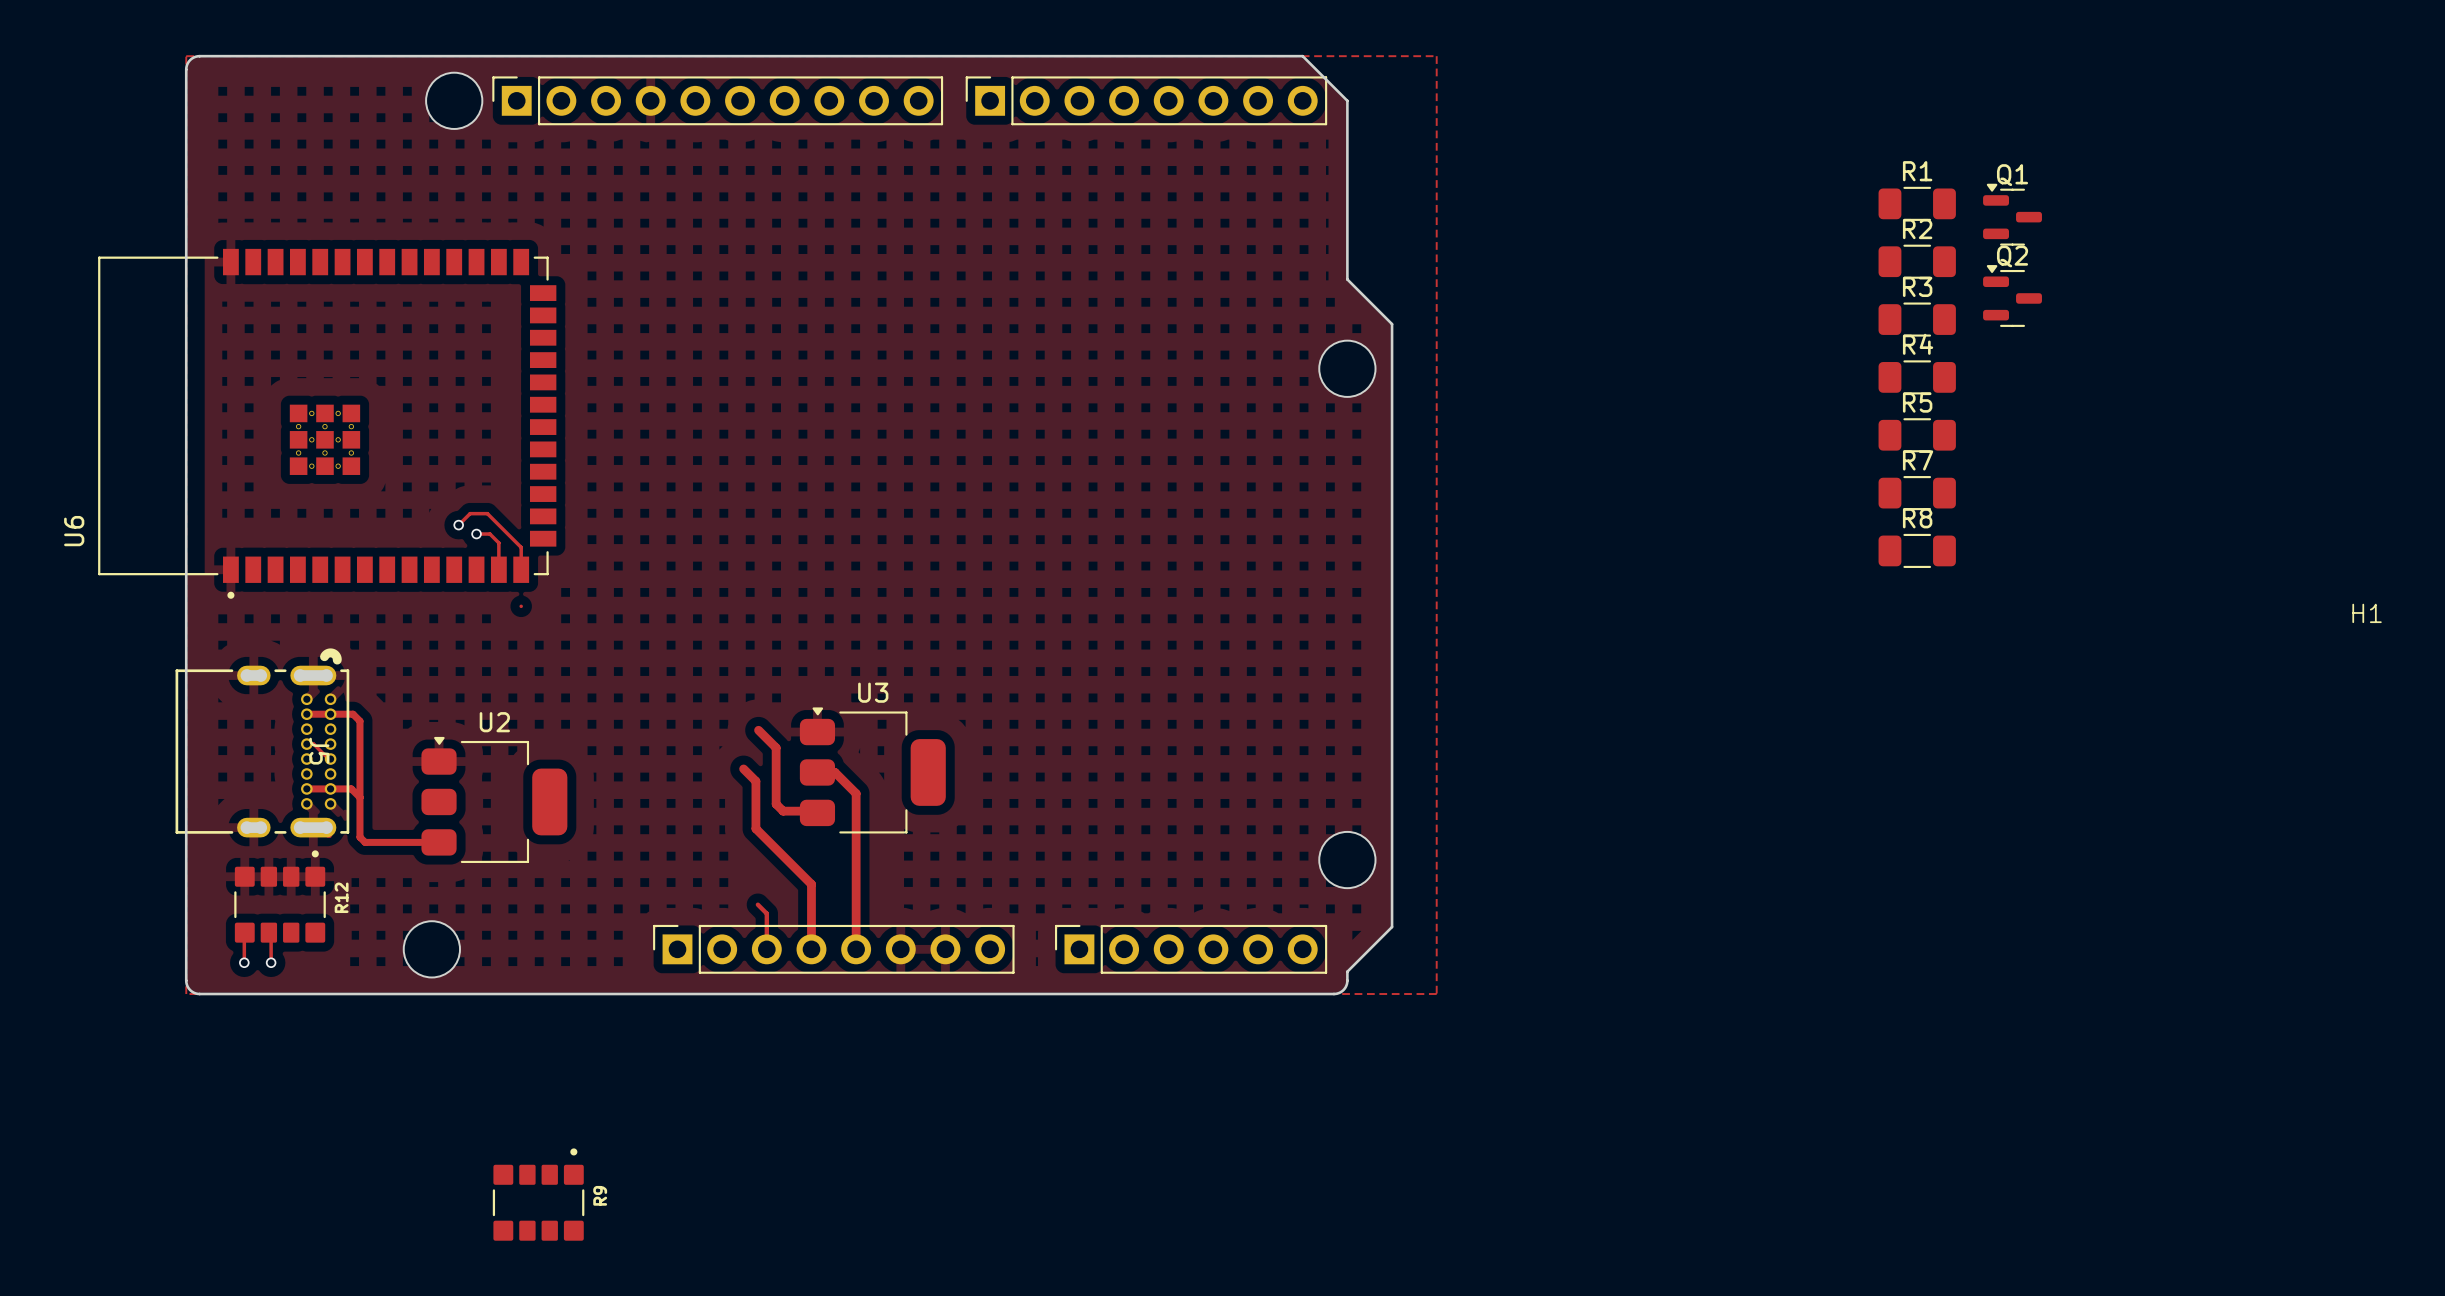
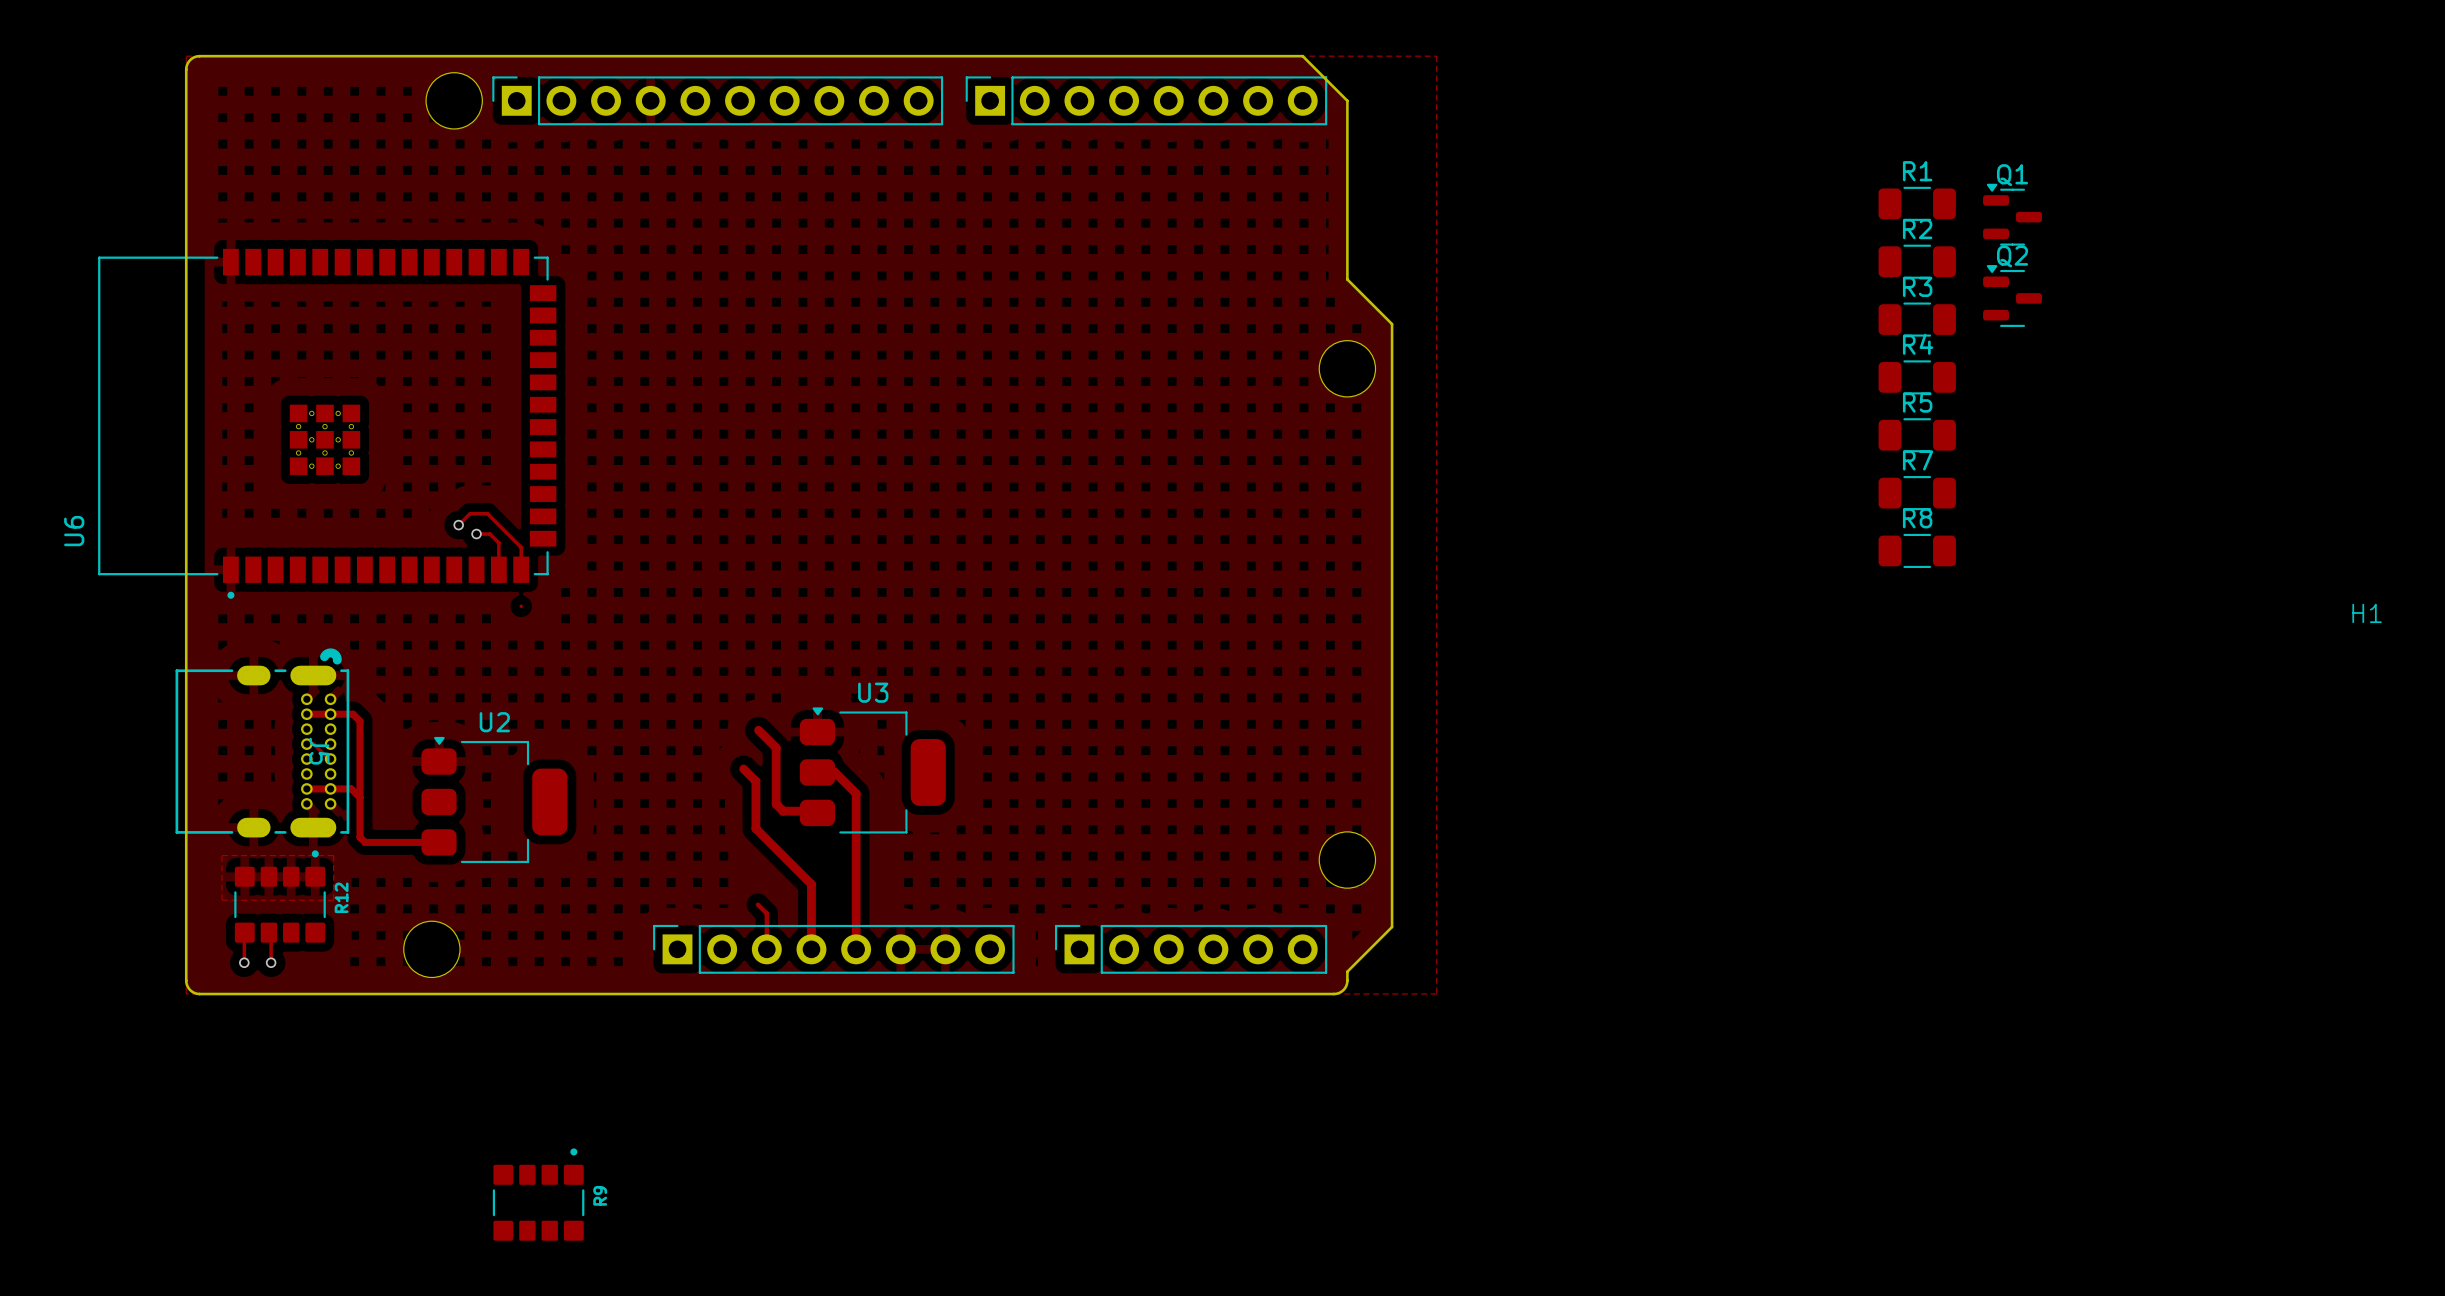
zone outline: none -> (221, 855) (333, 855) (333, 900) (221, 900) (221, 855)

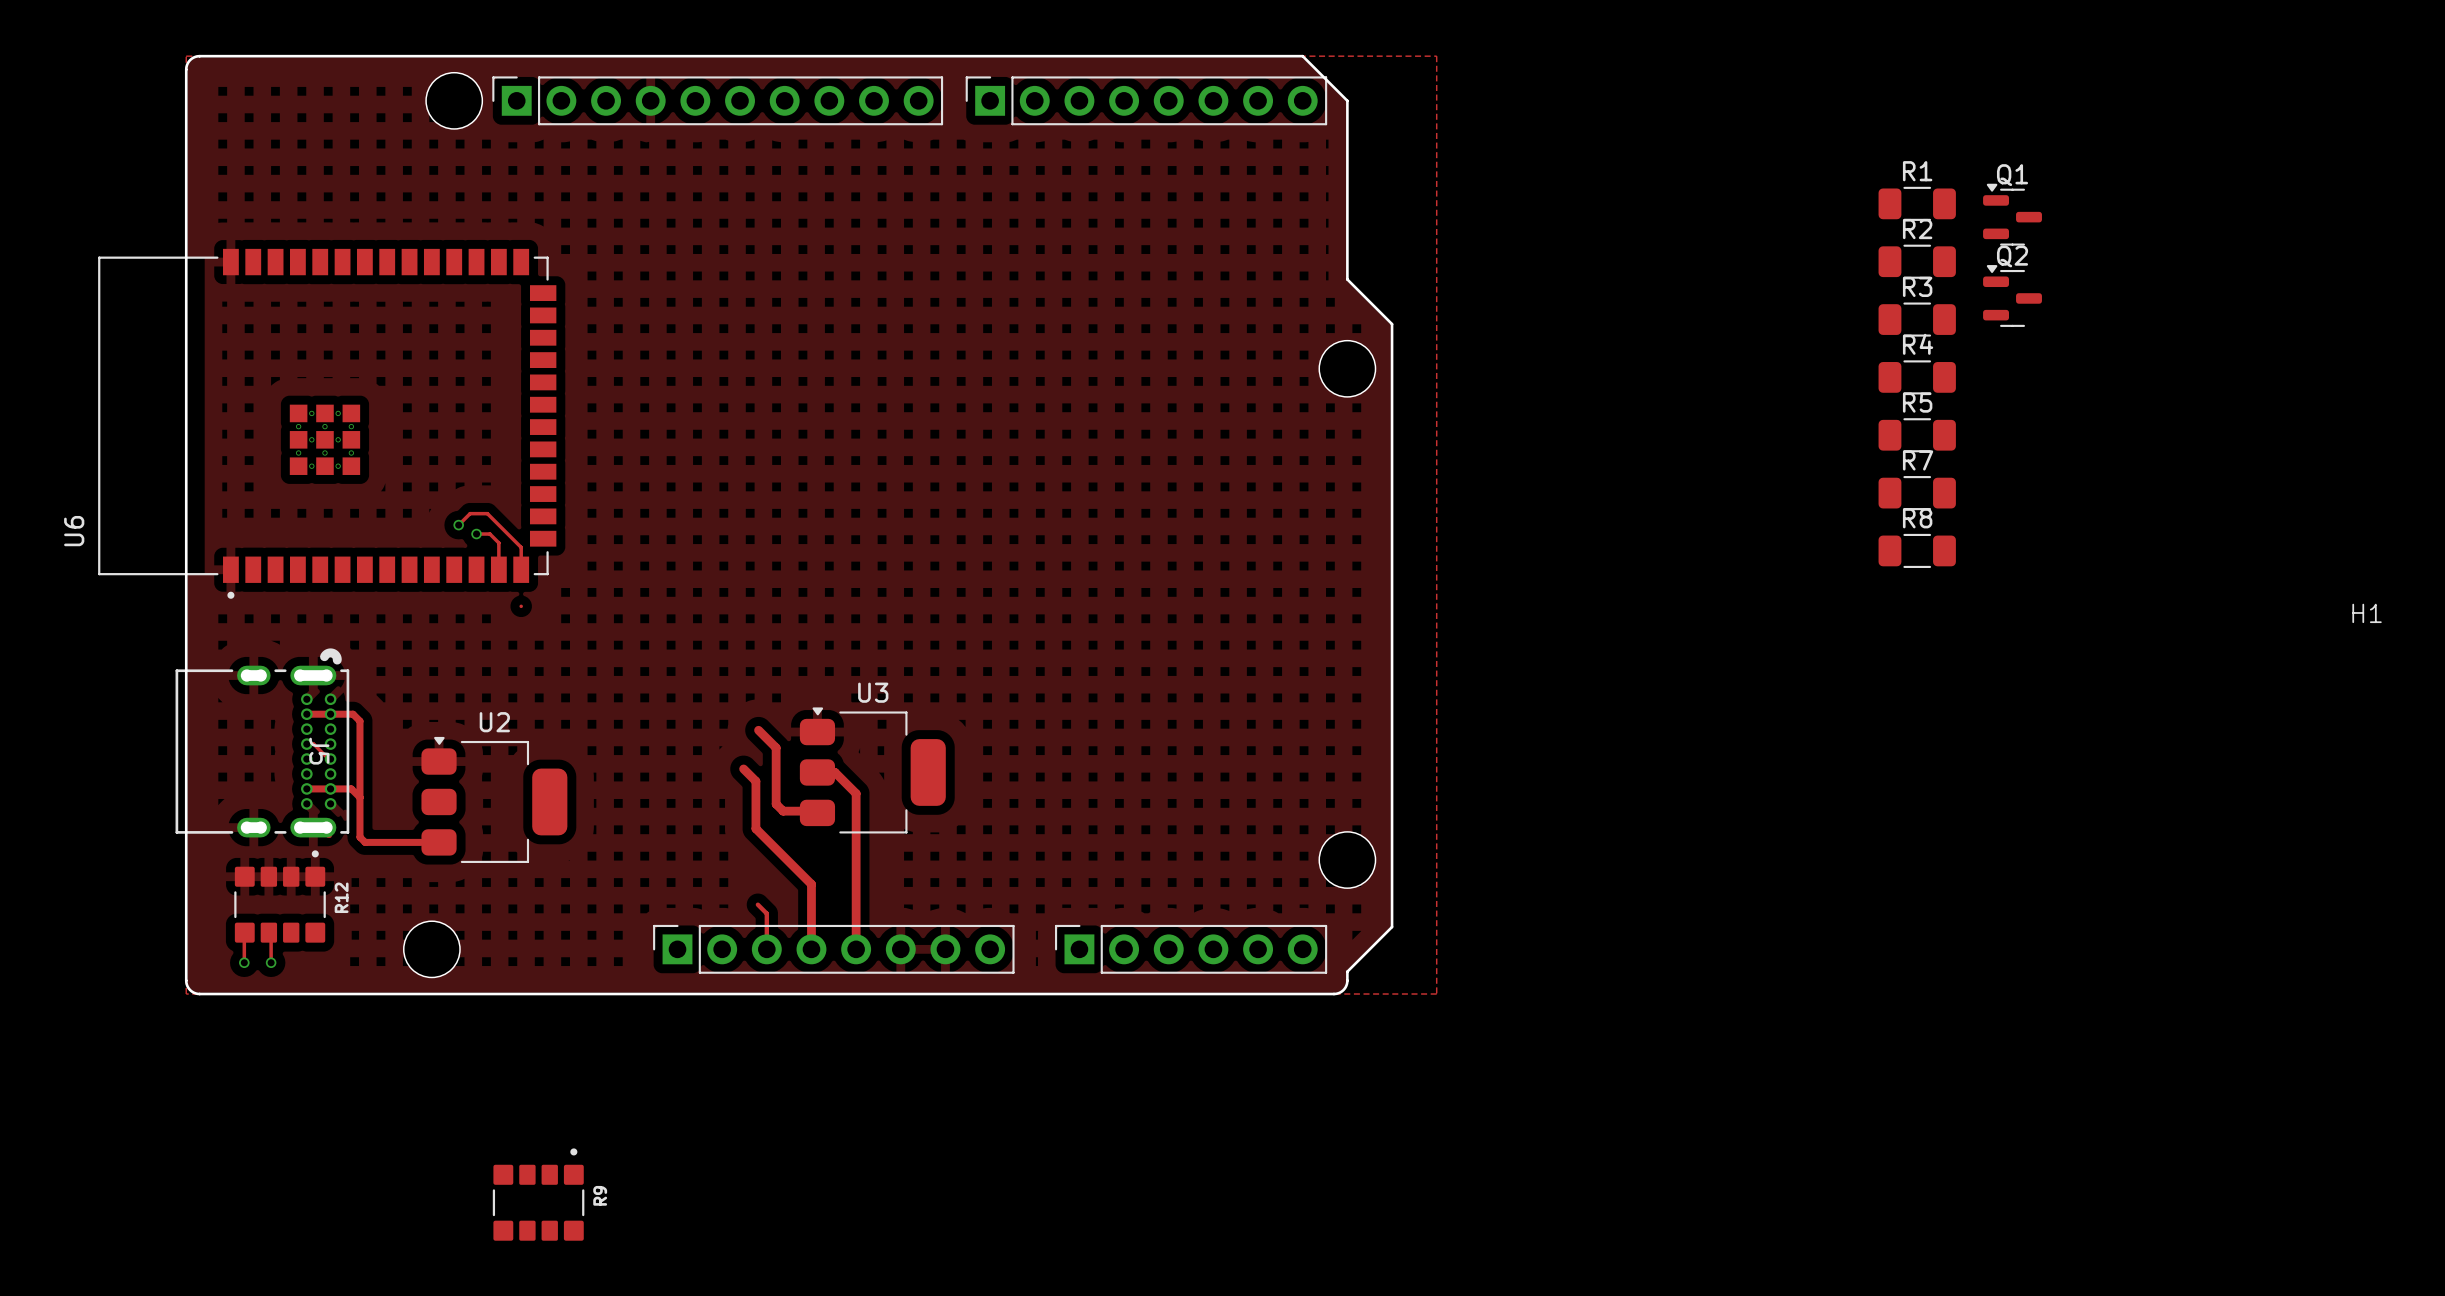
zone outline: (221, 855) (333, 855) (333, 900) (221, 900) (221, 855) -> none

